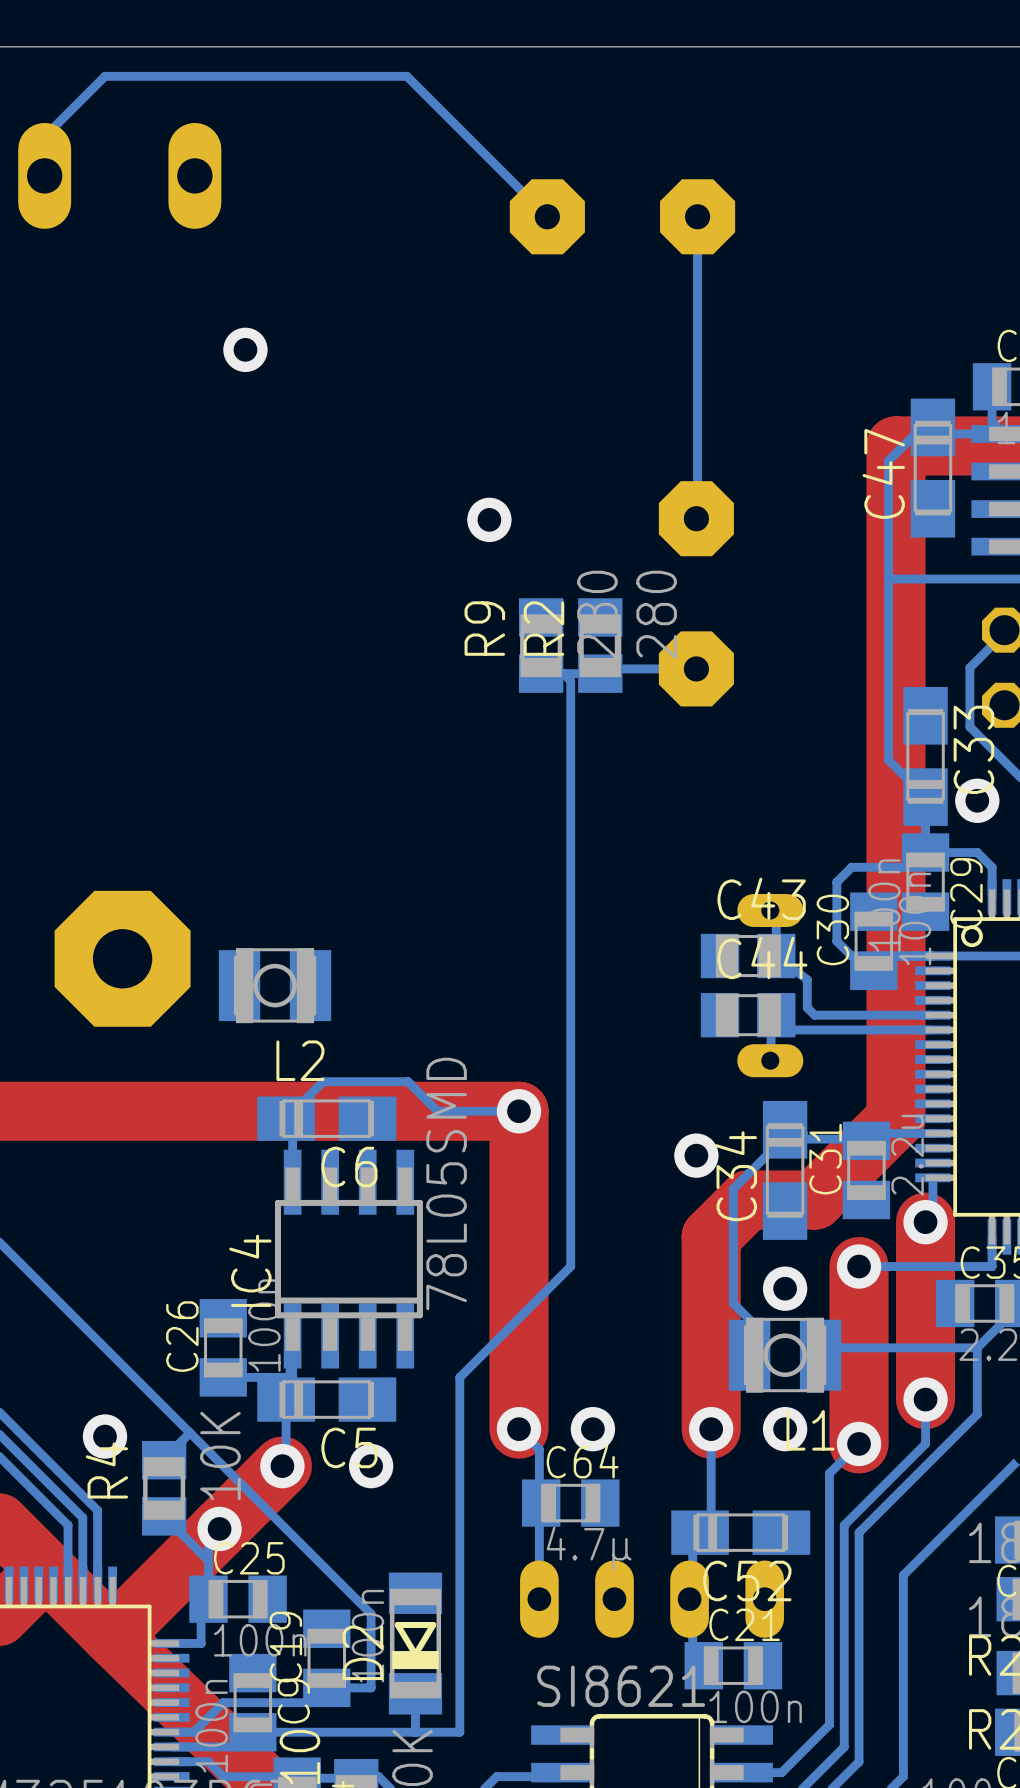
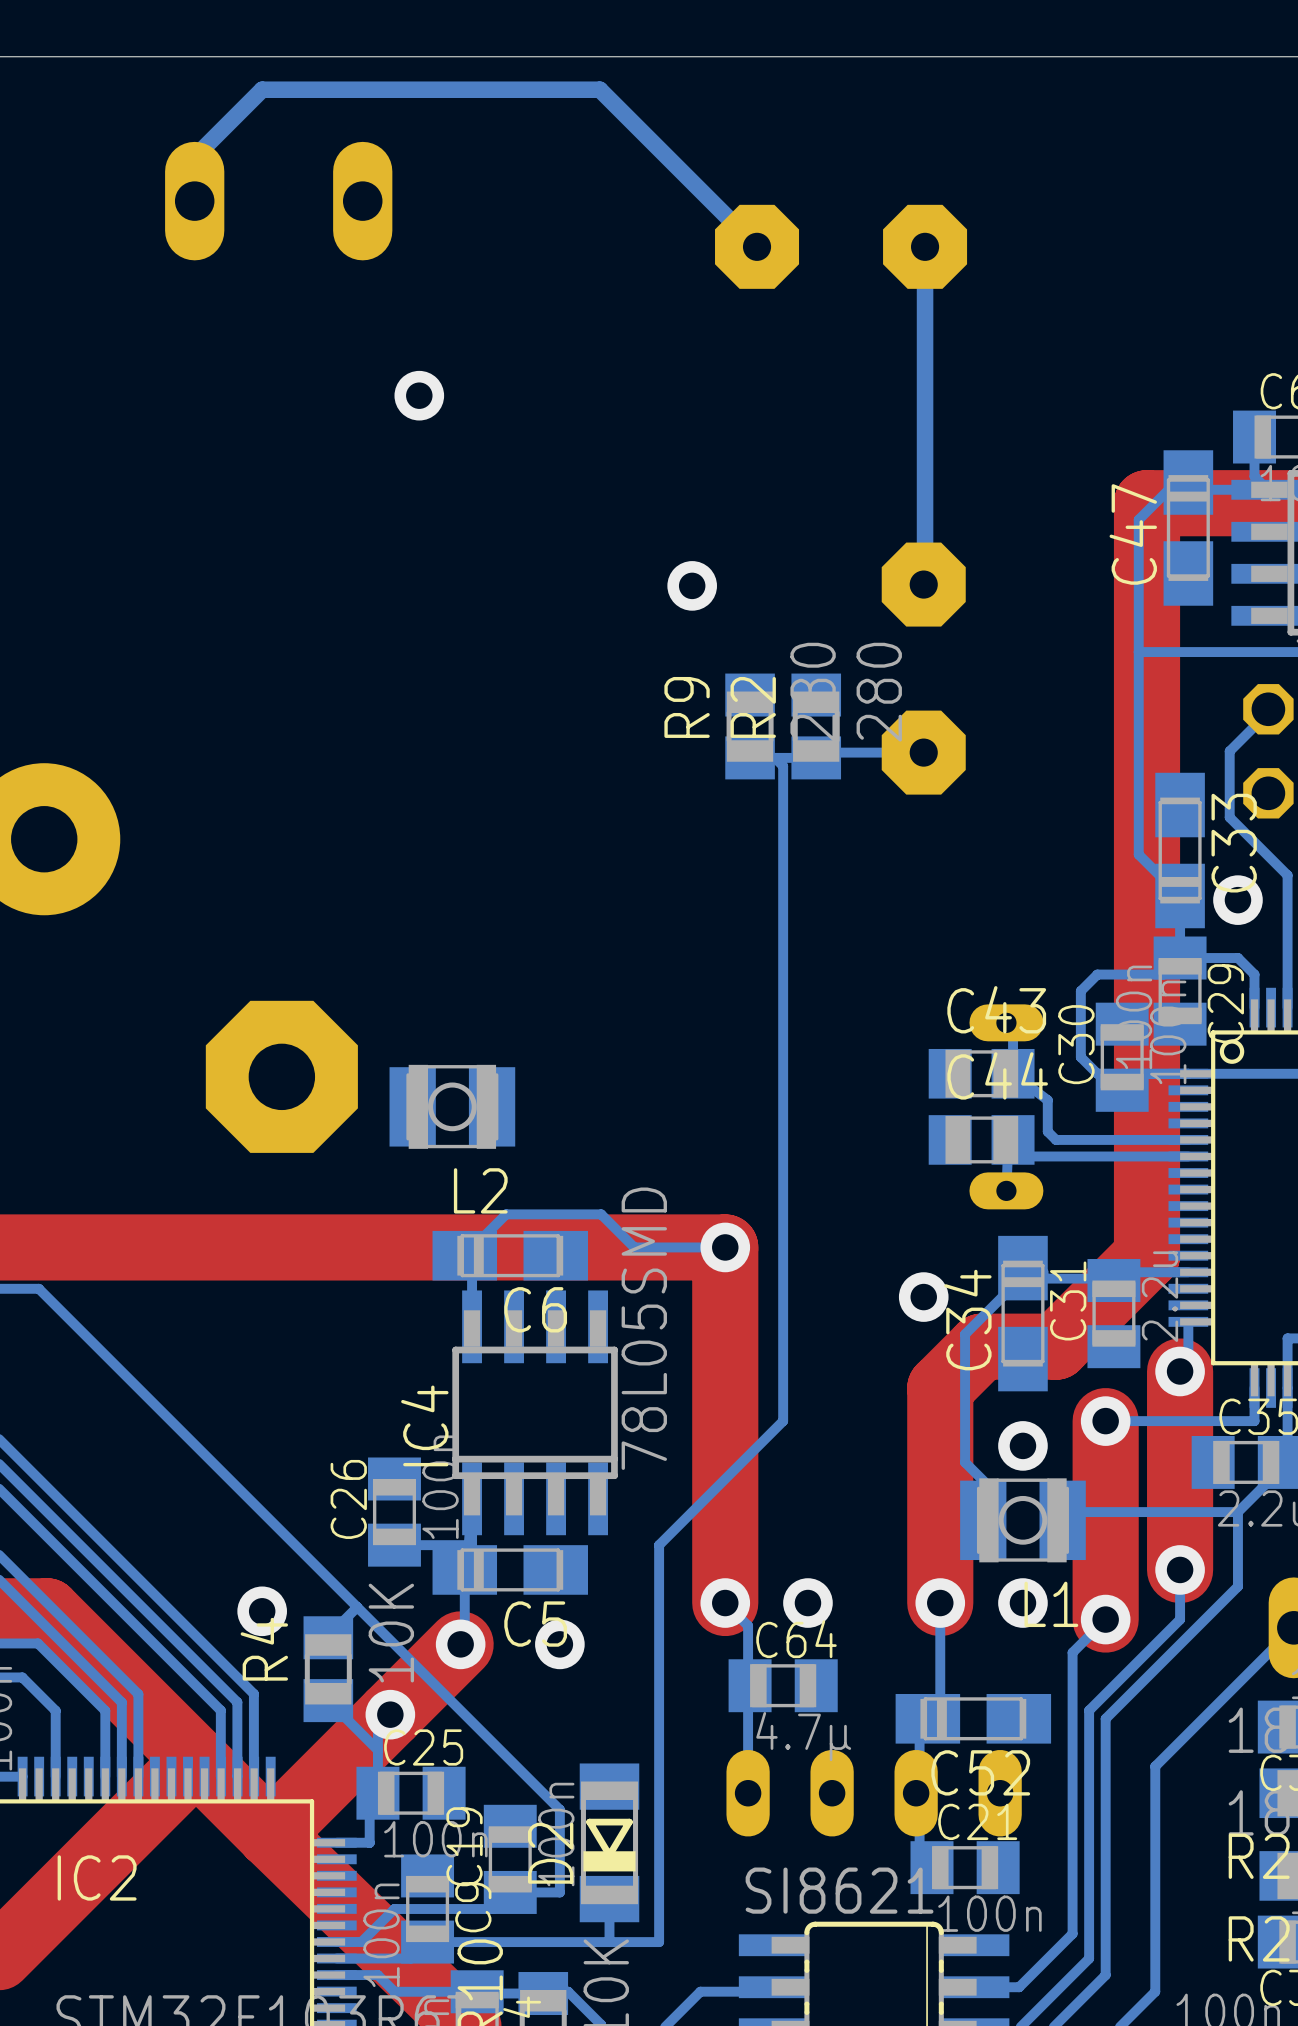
bottom track width: thin (45, 135) (105, 76) (406, 76) (547, 216) -> thick (196, 155) (262, 89) (599, 89) (757, 246)
bottom track width: thin (697, 216) (697, 517) -> thick (925, 246) (925, 583)

